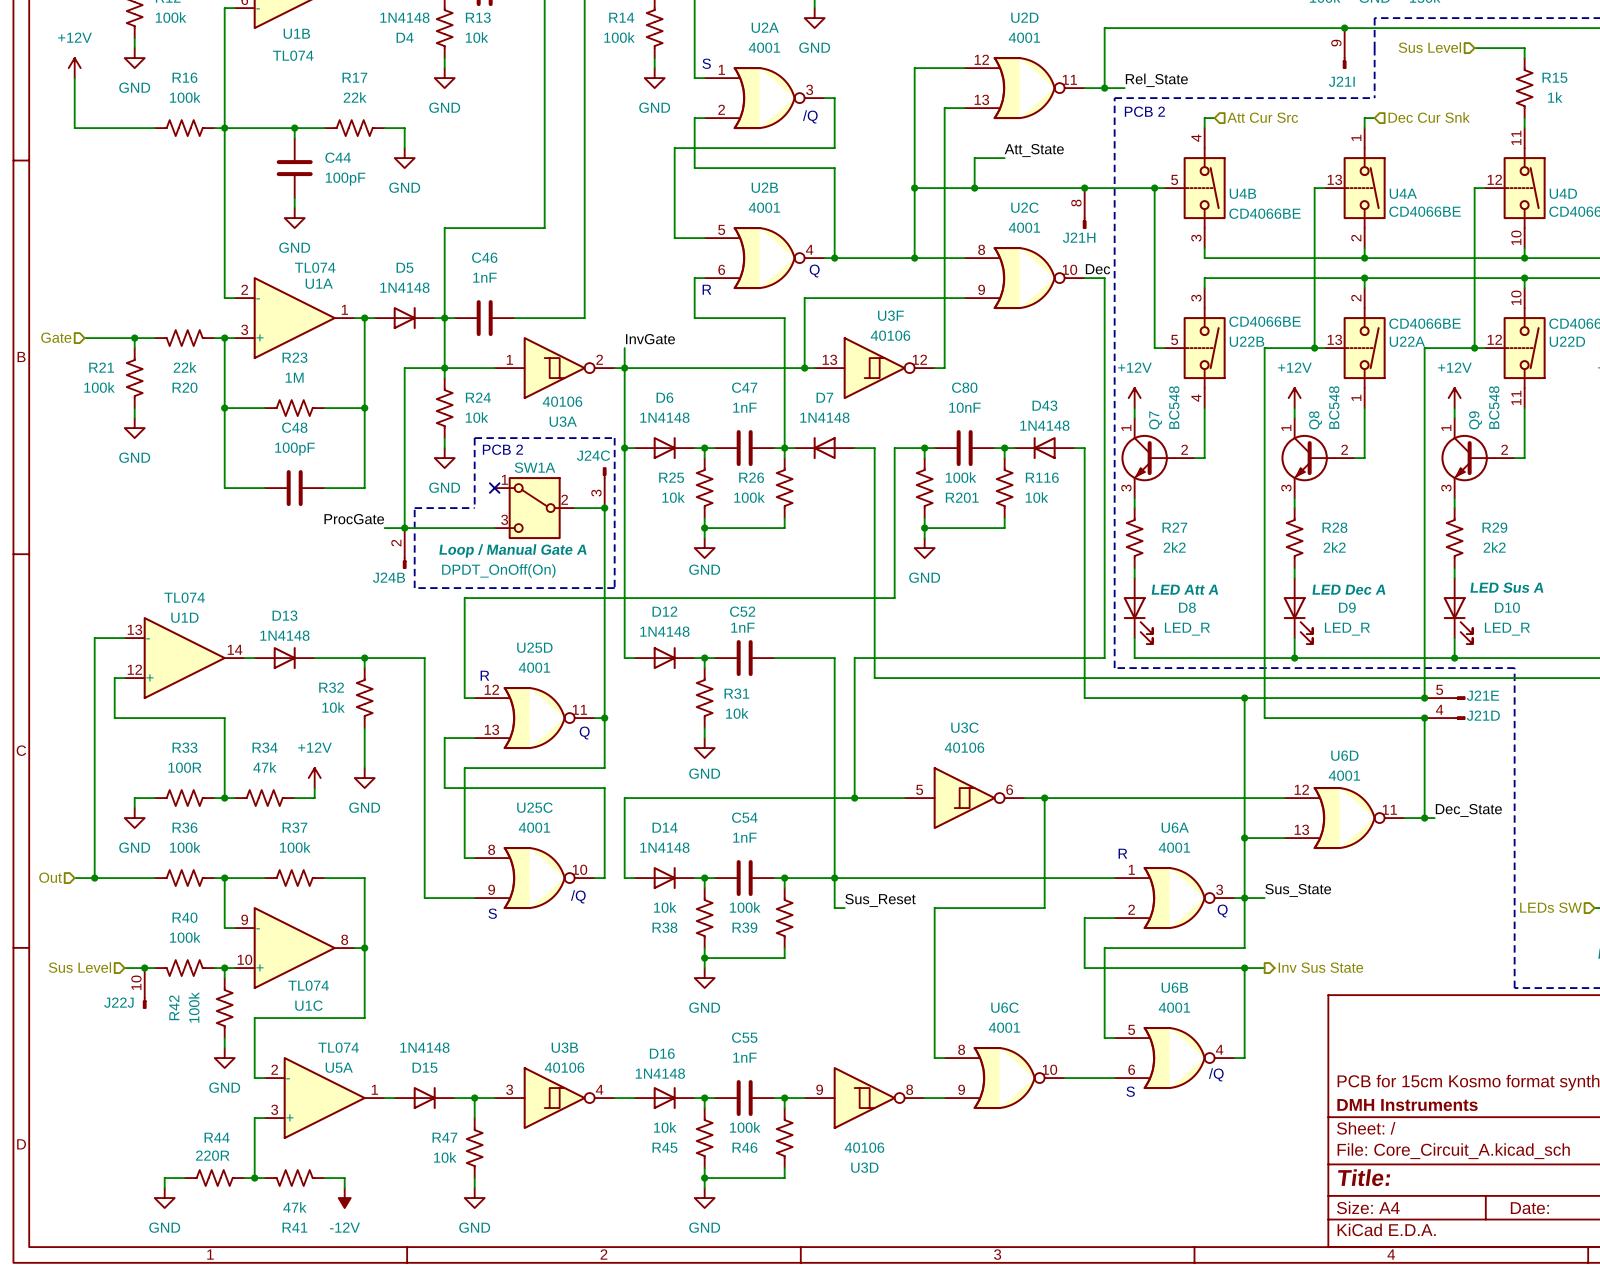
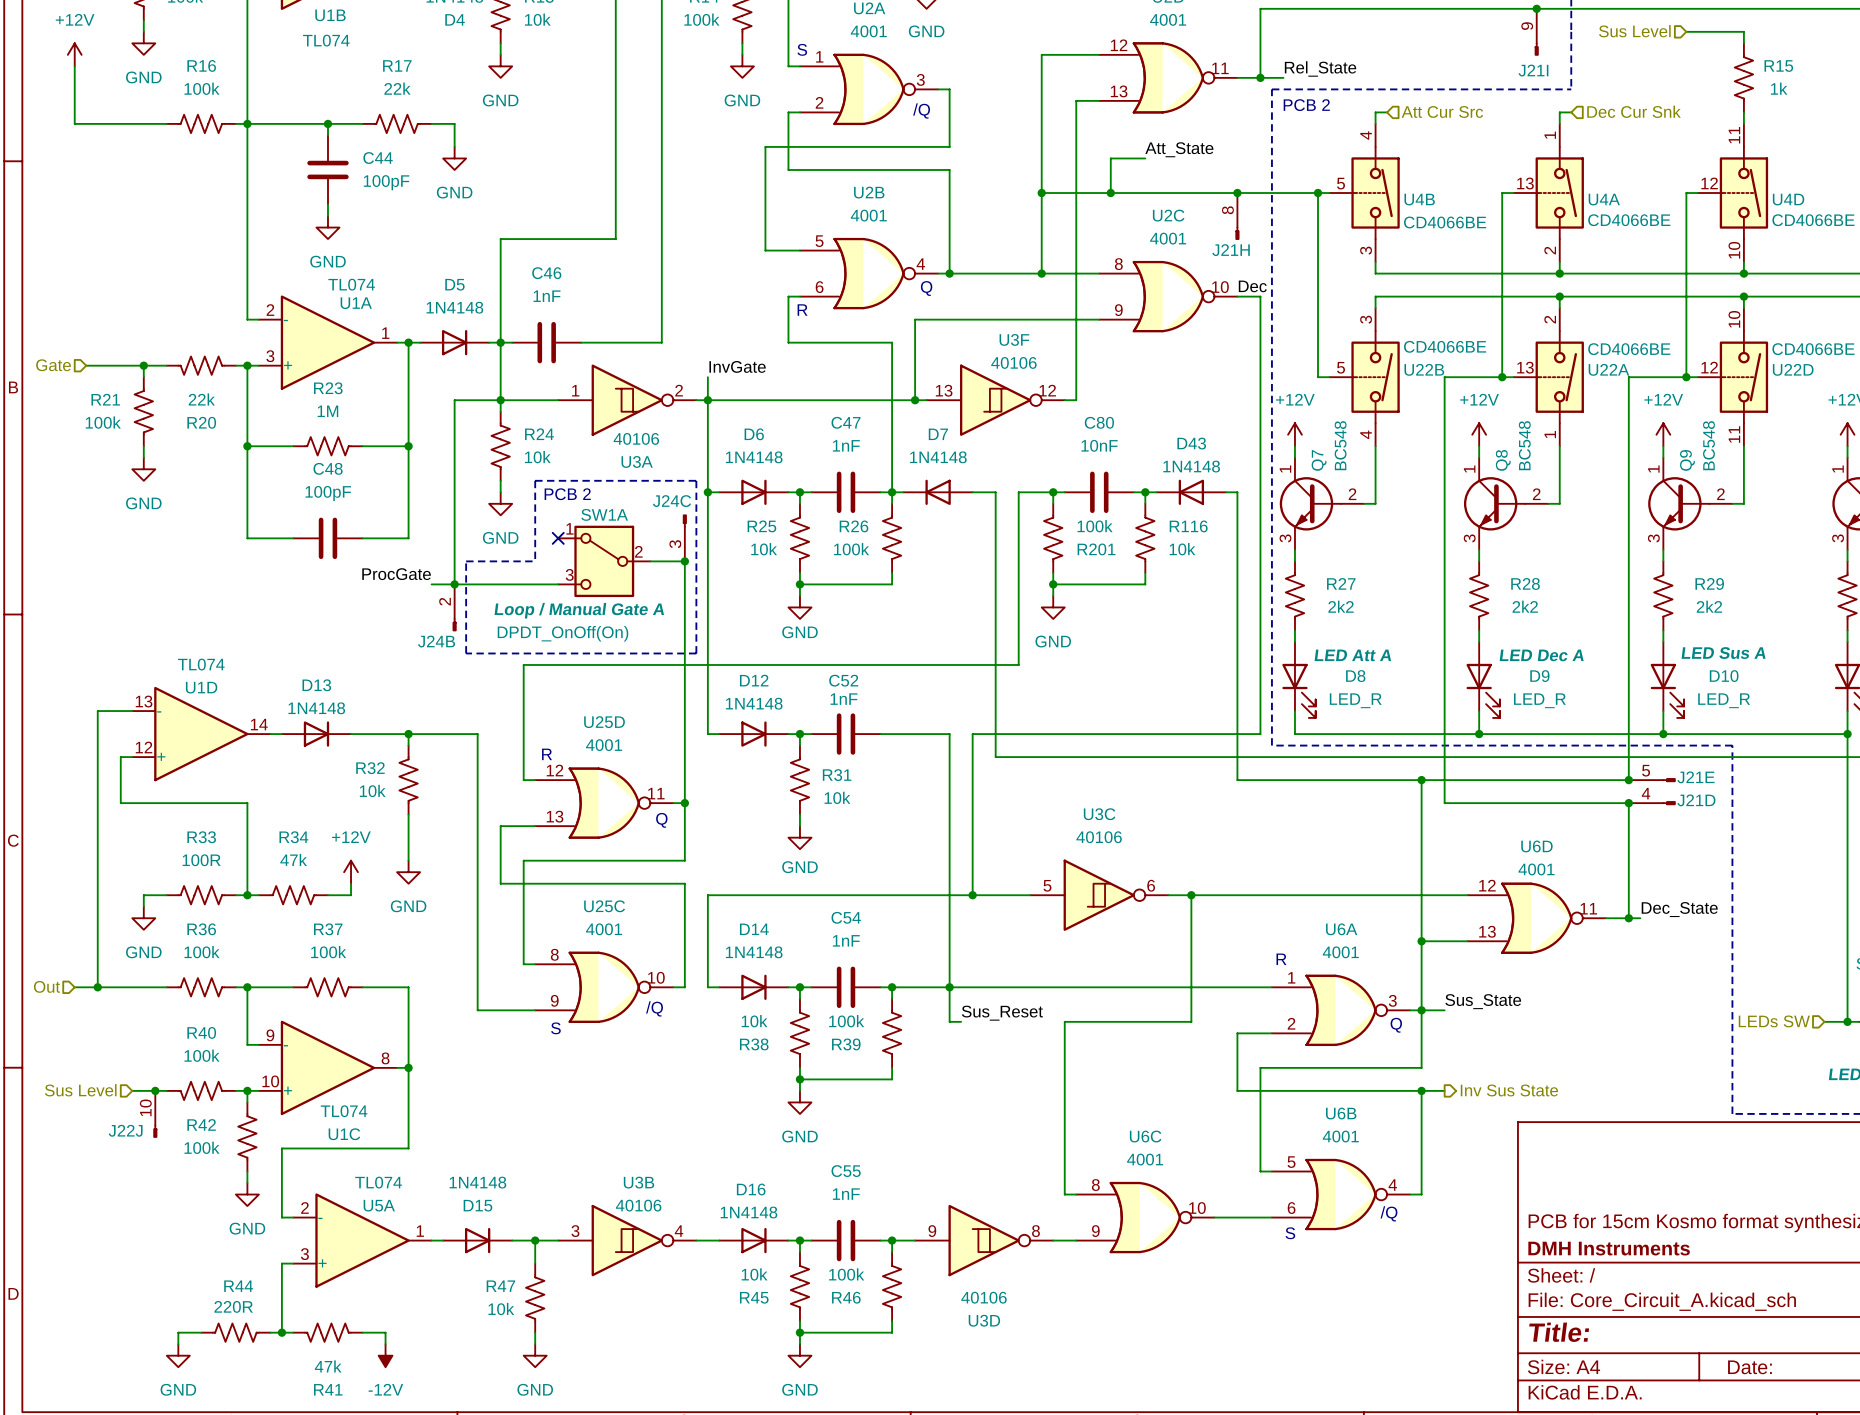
R42 name rotation: 0° (174, 1007) -> 90° clockwise (201, 1124)
R42 value rotation: 0° (194, 1007) -> 90° clockwise (202, 1147)

